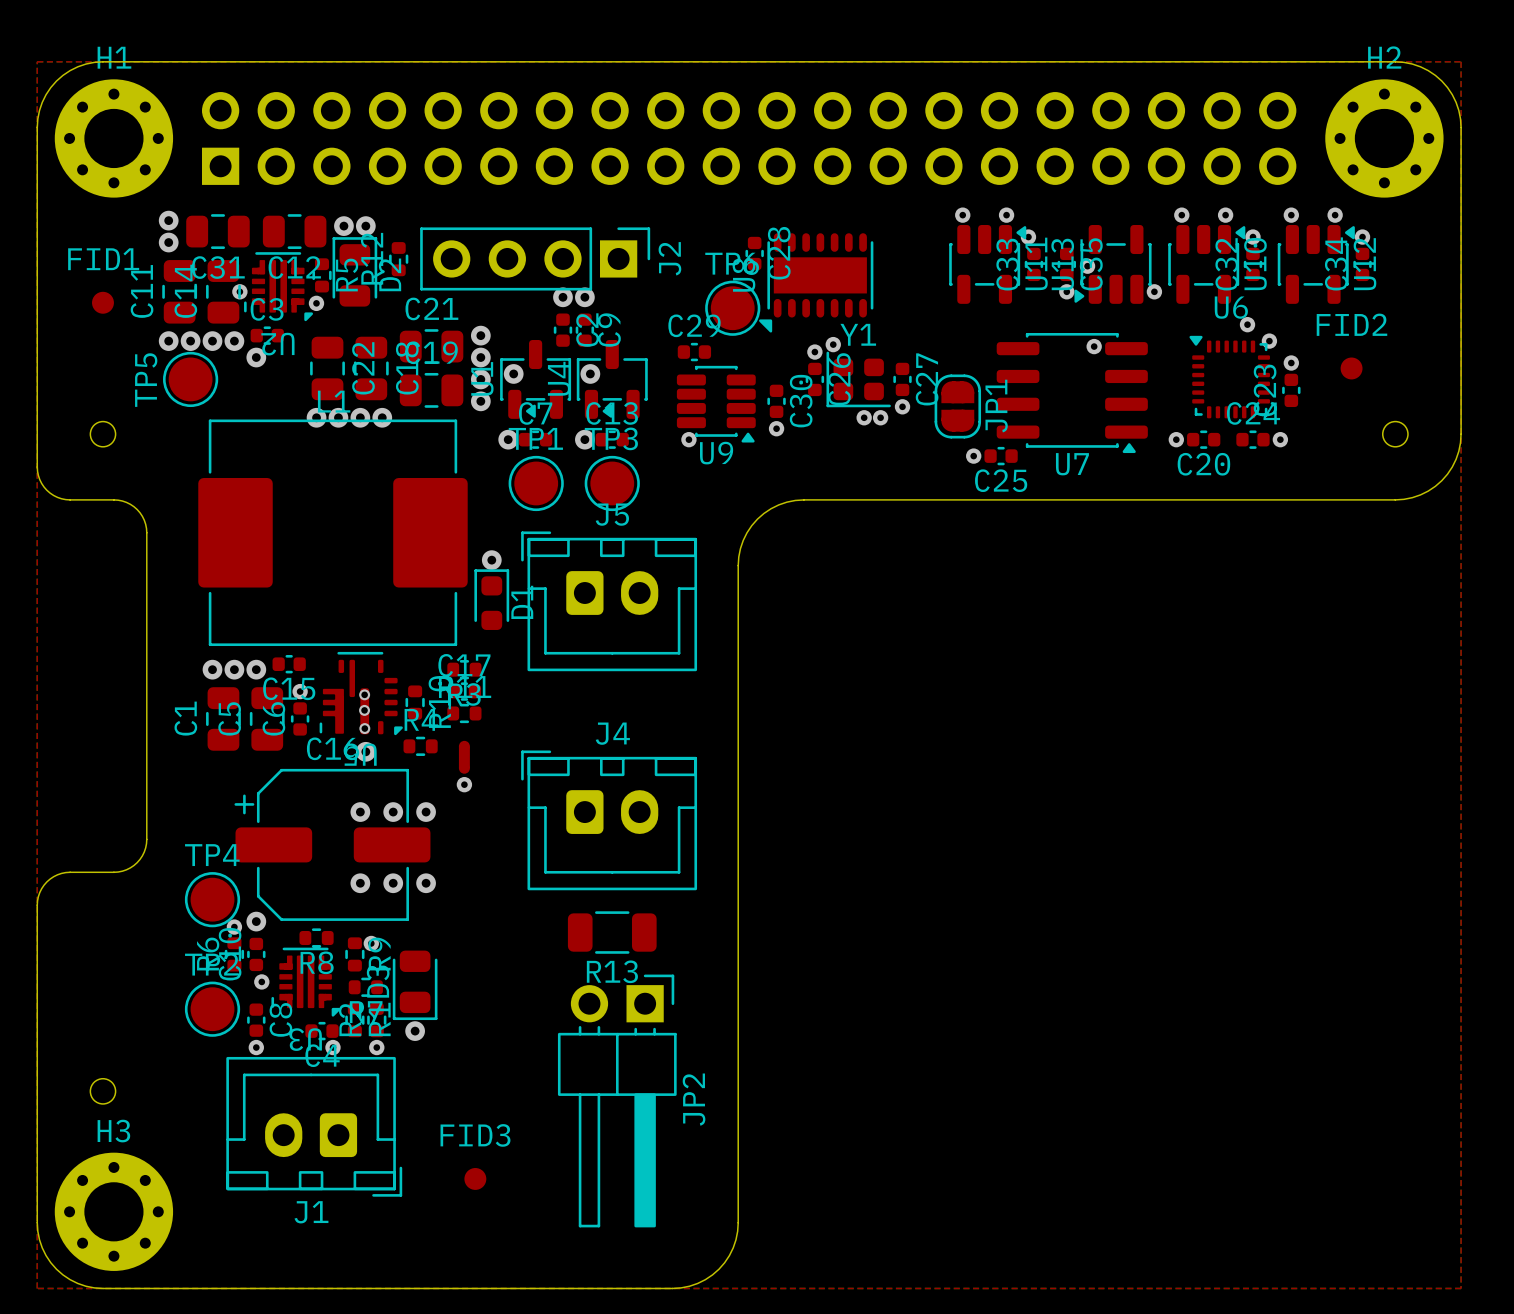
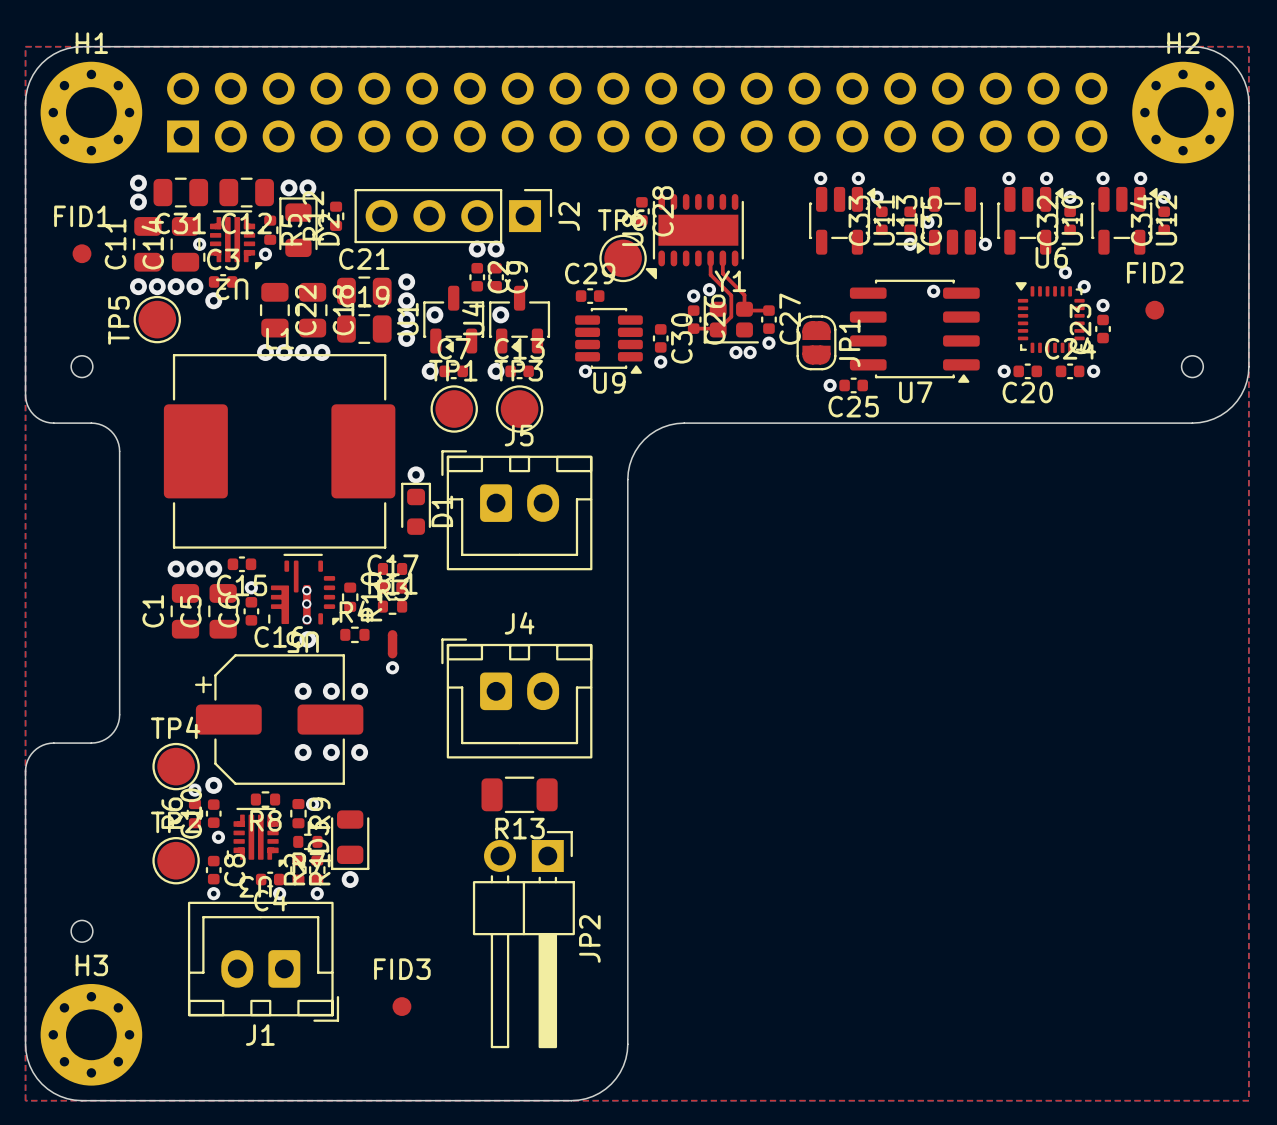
top track: none -> (710, 258) (710, 274) (731, 295) (731, 316) (718, 329) (693, 328)
top track: none -> (722, 258) (722, 273) (744, 295) (744, 309) (768, 310)

